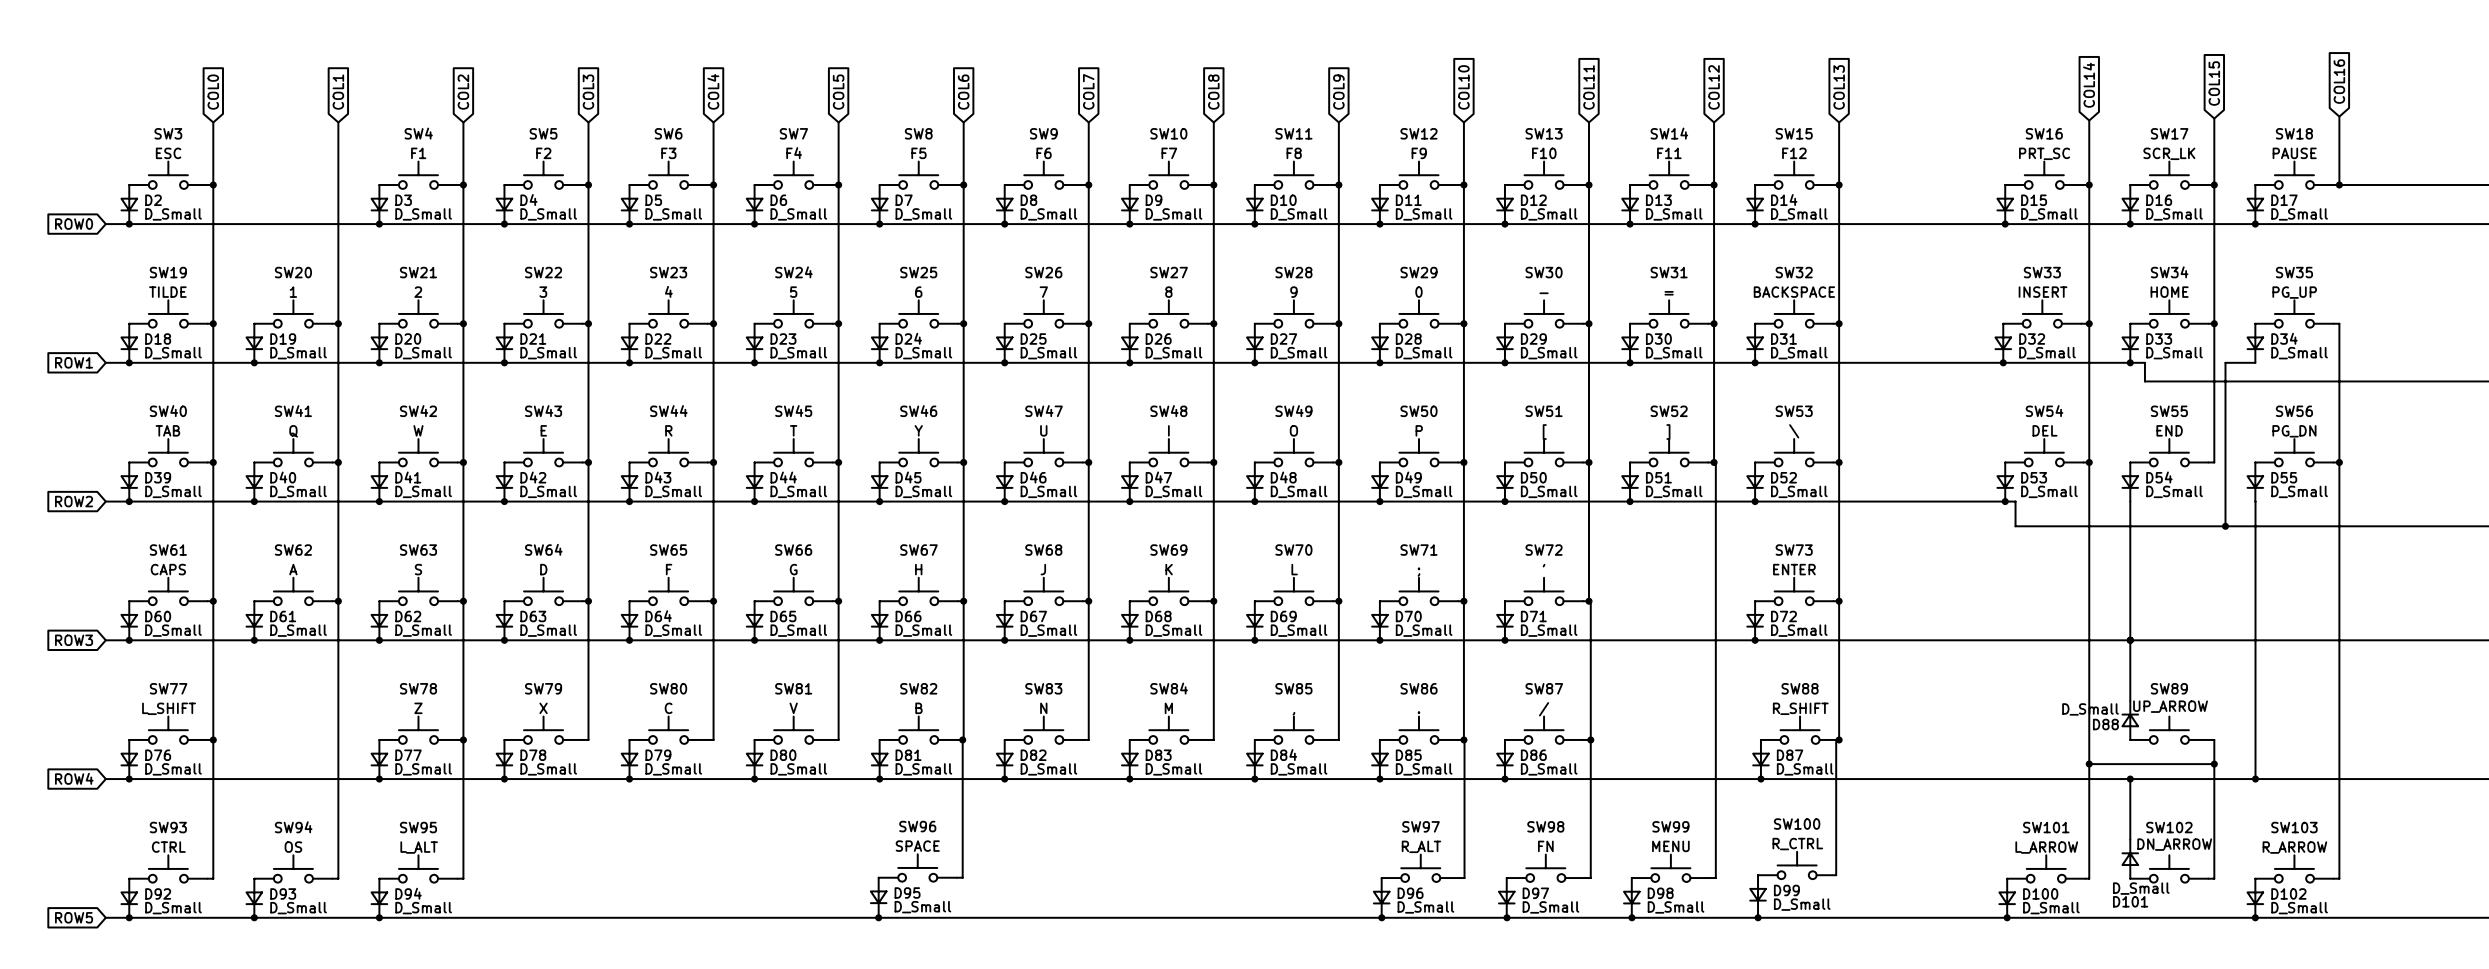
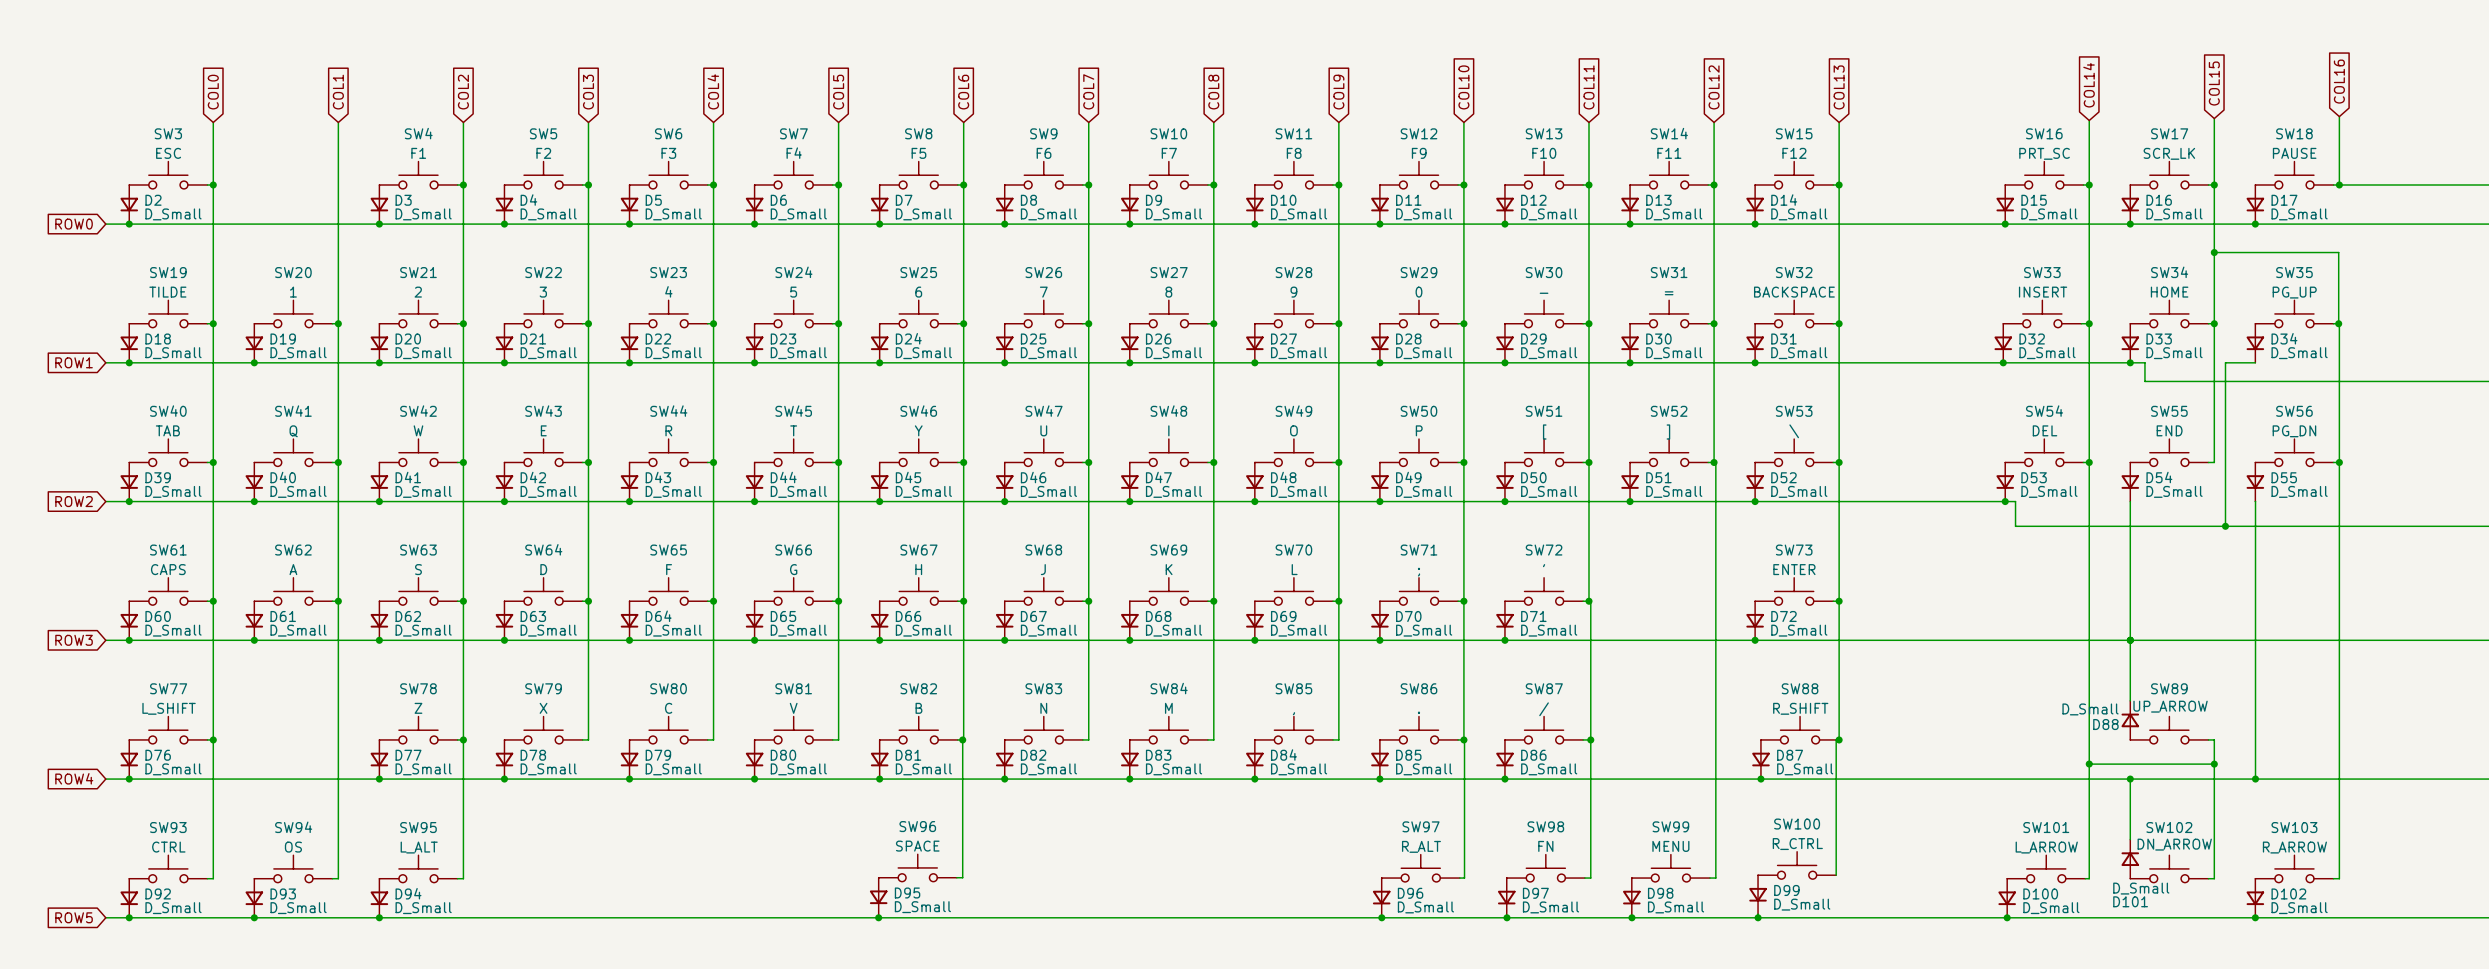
wire: none -> (2214, 252) (2338, 252) (2338, 323)
junction: none -> (2214, 252)
junction: none -> (2338, 323)

